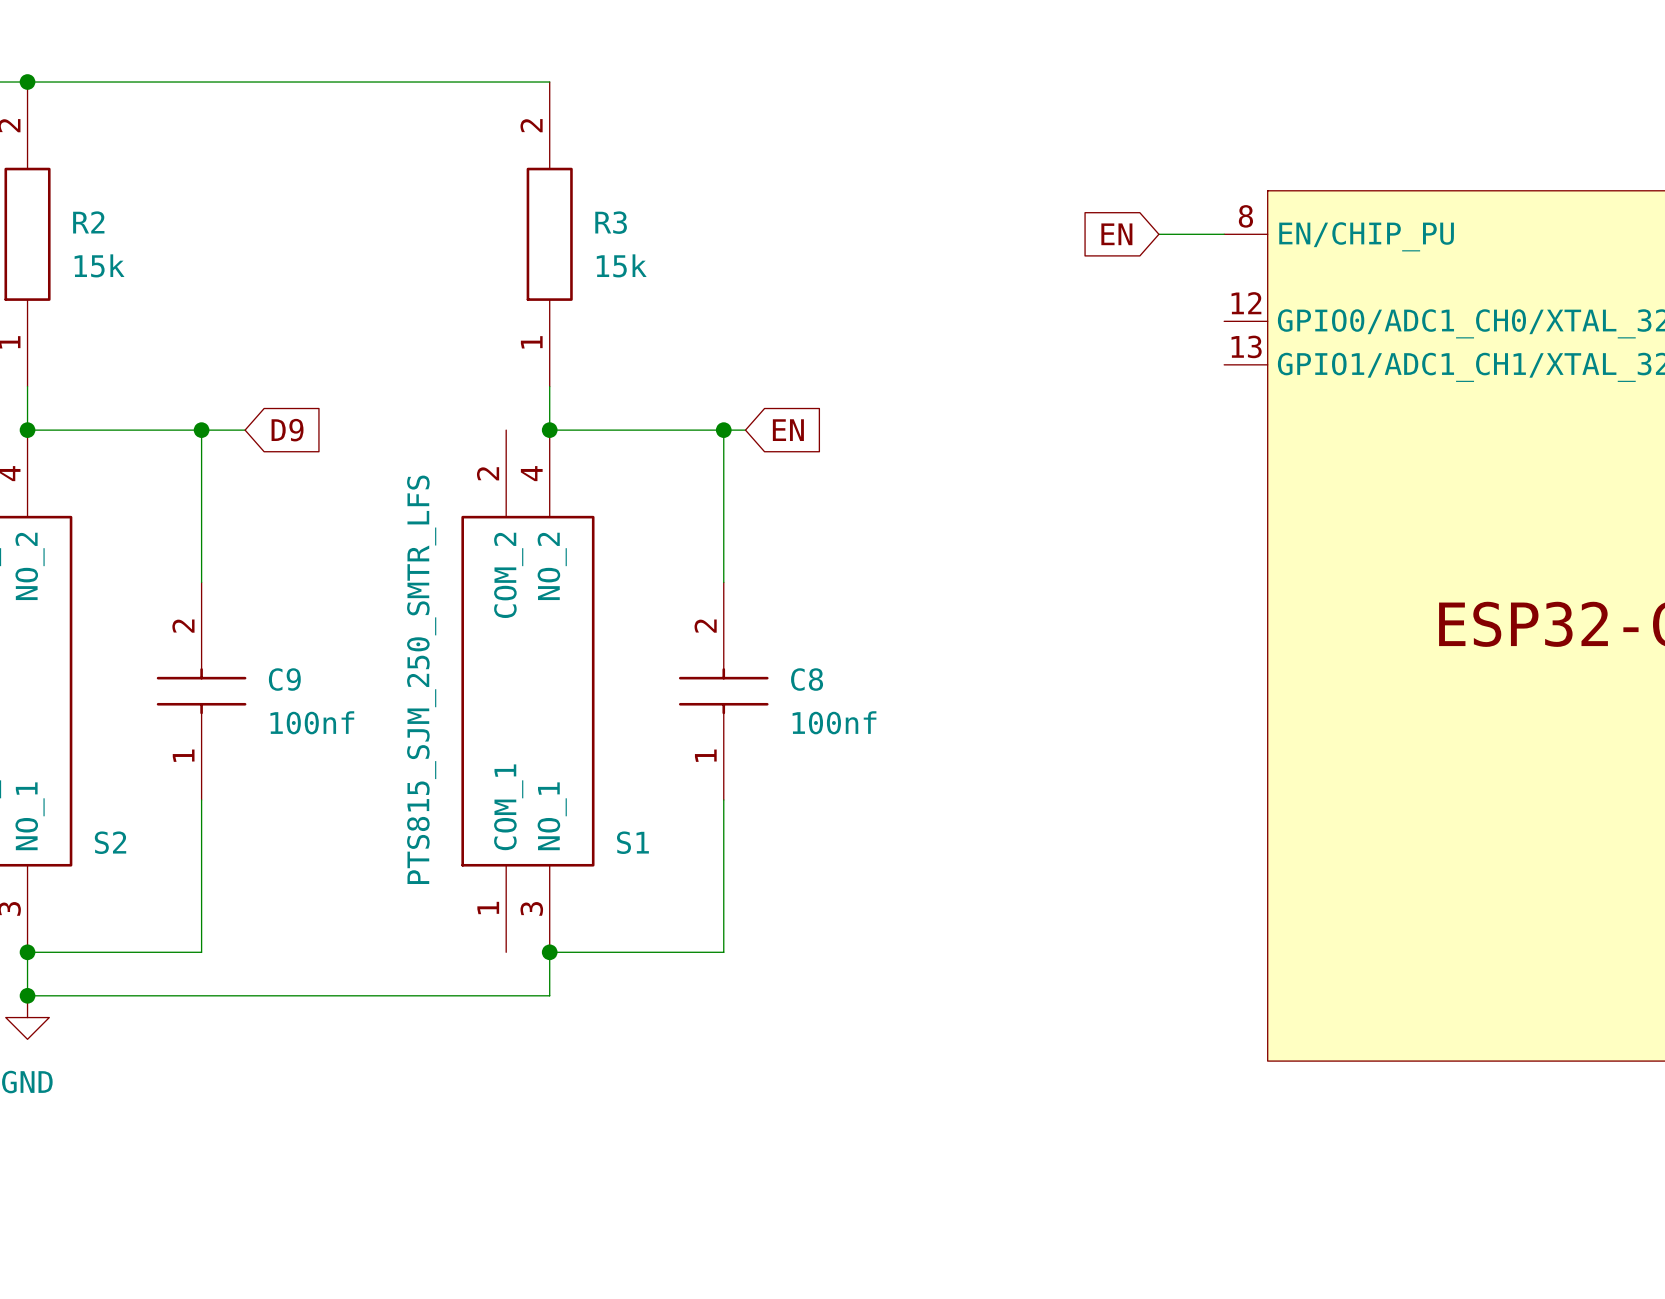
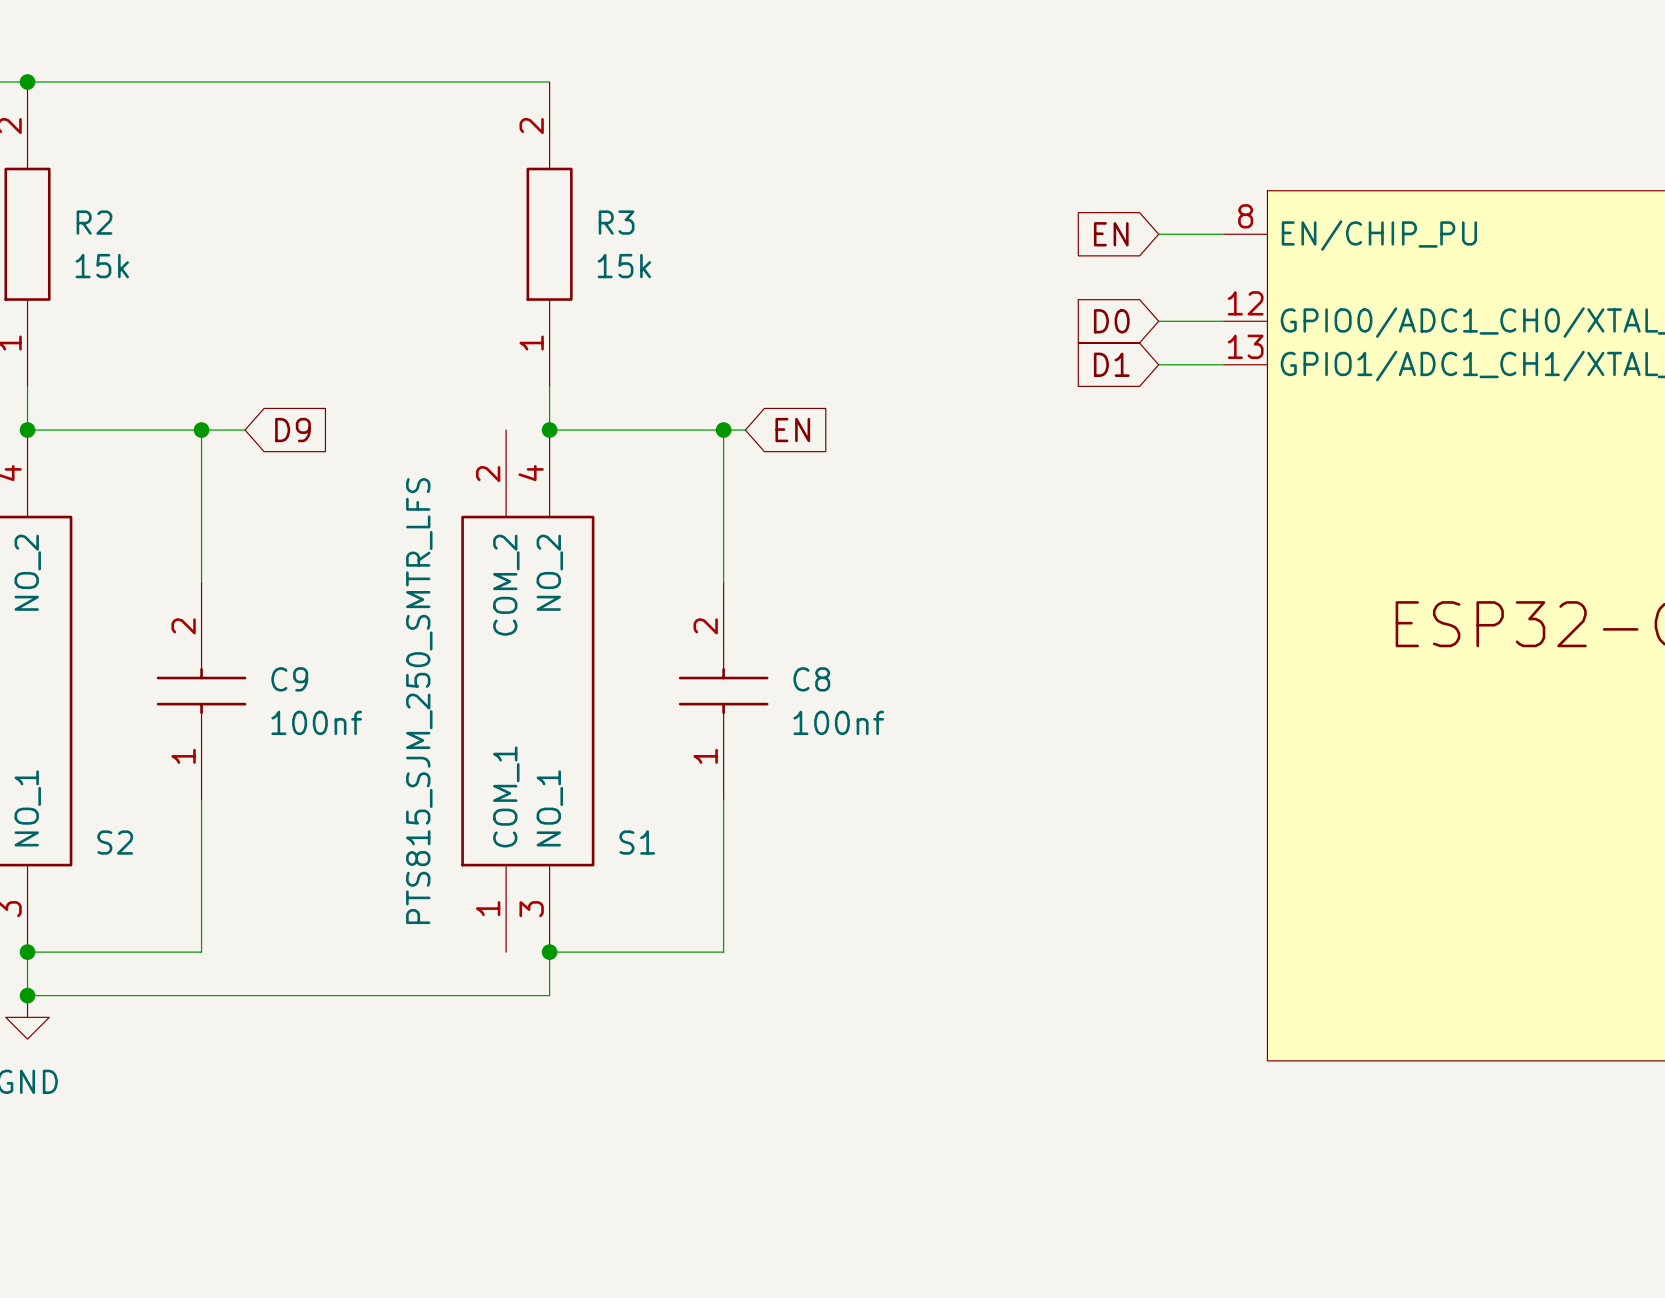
global label: none -> D0 (1111, 321)
wire: none -> (1158, 321) (1223, 321)
global label: none -> D1 (1111, 364)
wire: none -> (1158, 364) (1223, 364)

